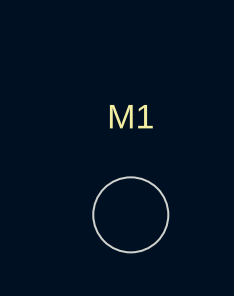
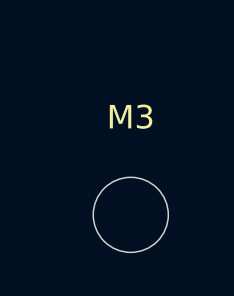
M1 name: M1 (131, 116) -> M3 (131, 116)

